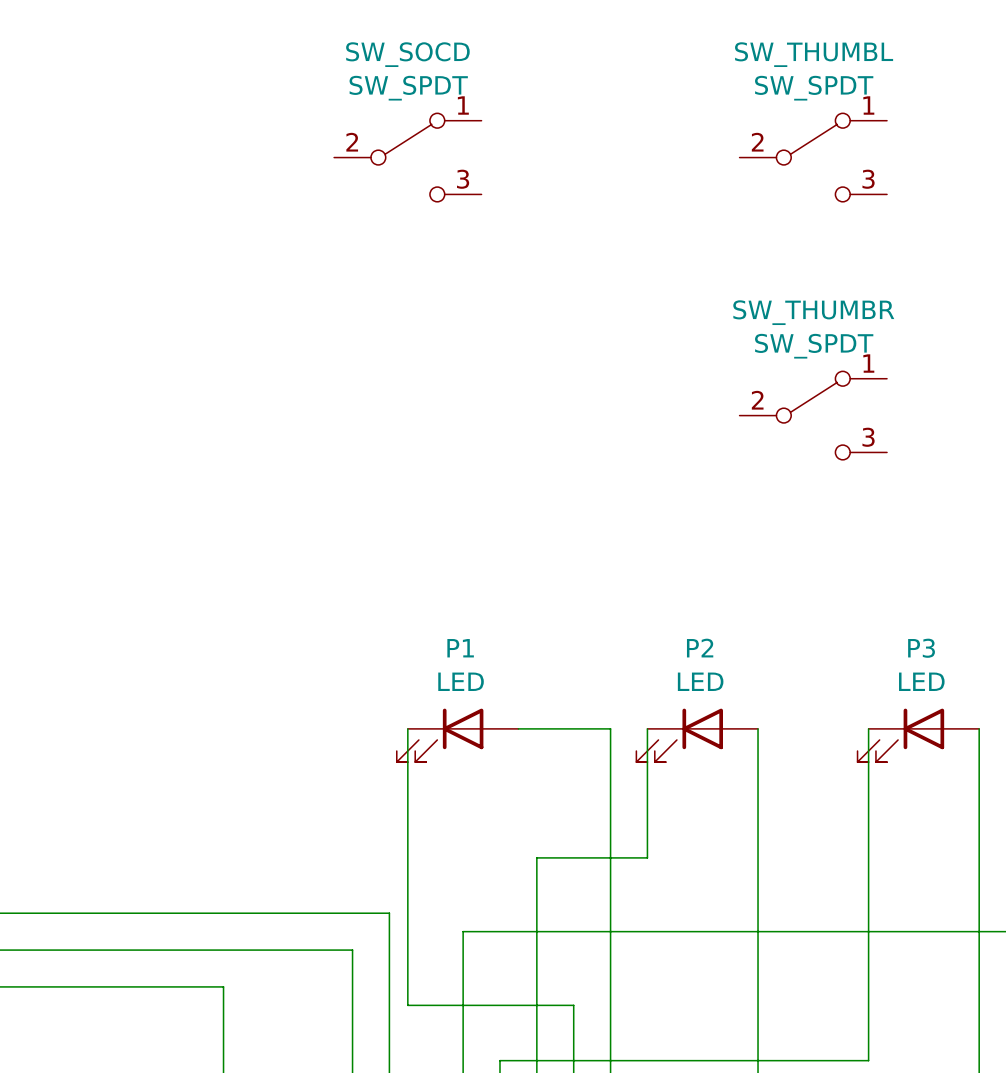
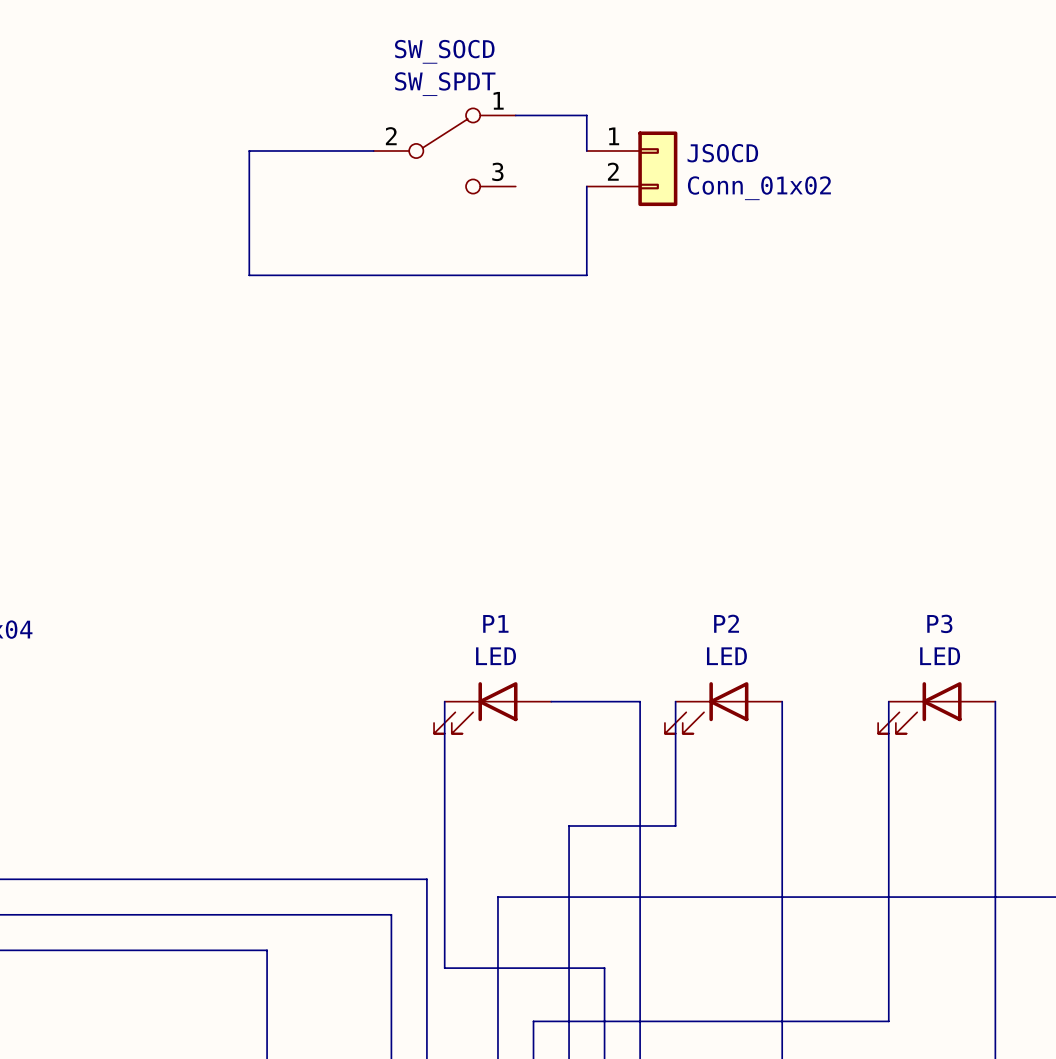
wire: none -> (515, 115) (586, 115) (586, 150)
wire: none -> (373, 150) (249, 150) (249, 275) (586, 275) (586, 186)
SW_THUMBL: SW_SPDT (813, 157) -> none
JSOCD: none -> Conn_01x02 (632, 168)
SW_THUMBR: SW_SPDT (813, 415) -> none

